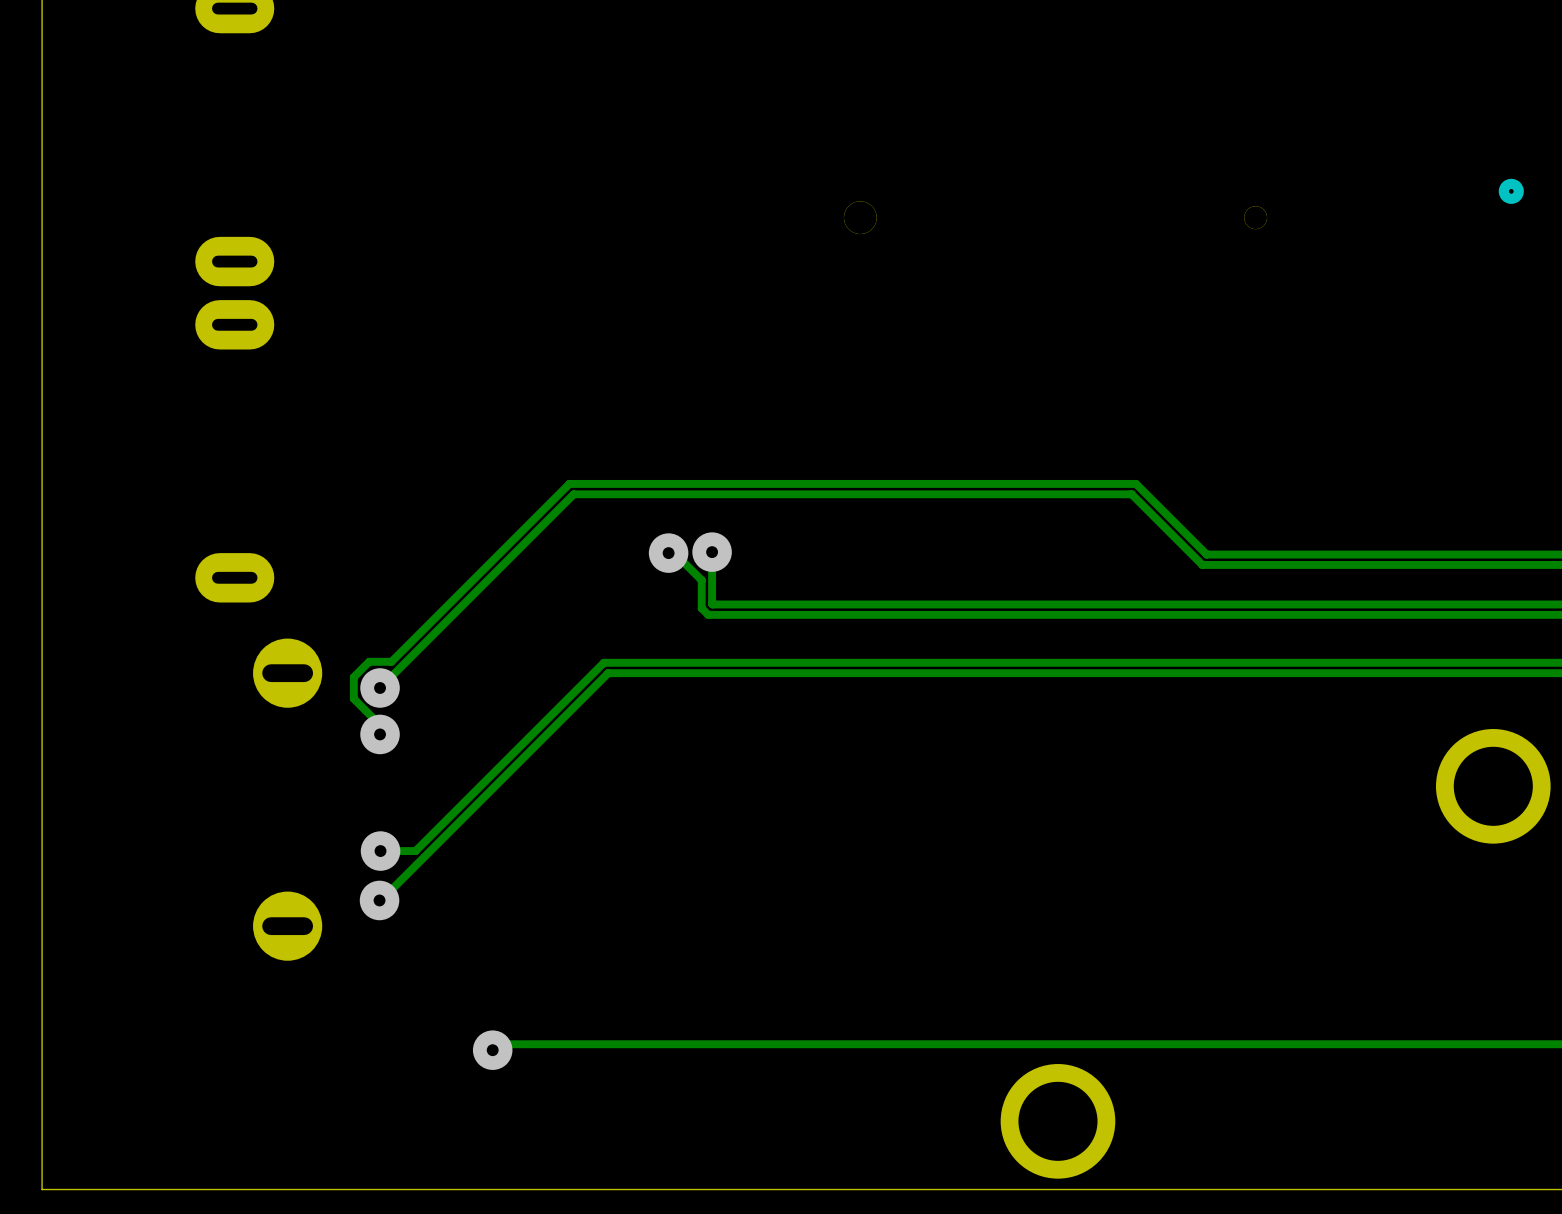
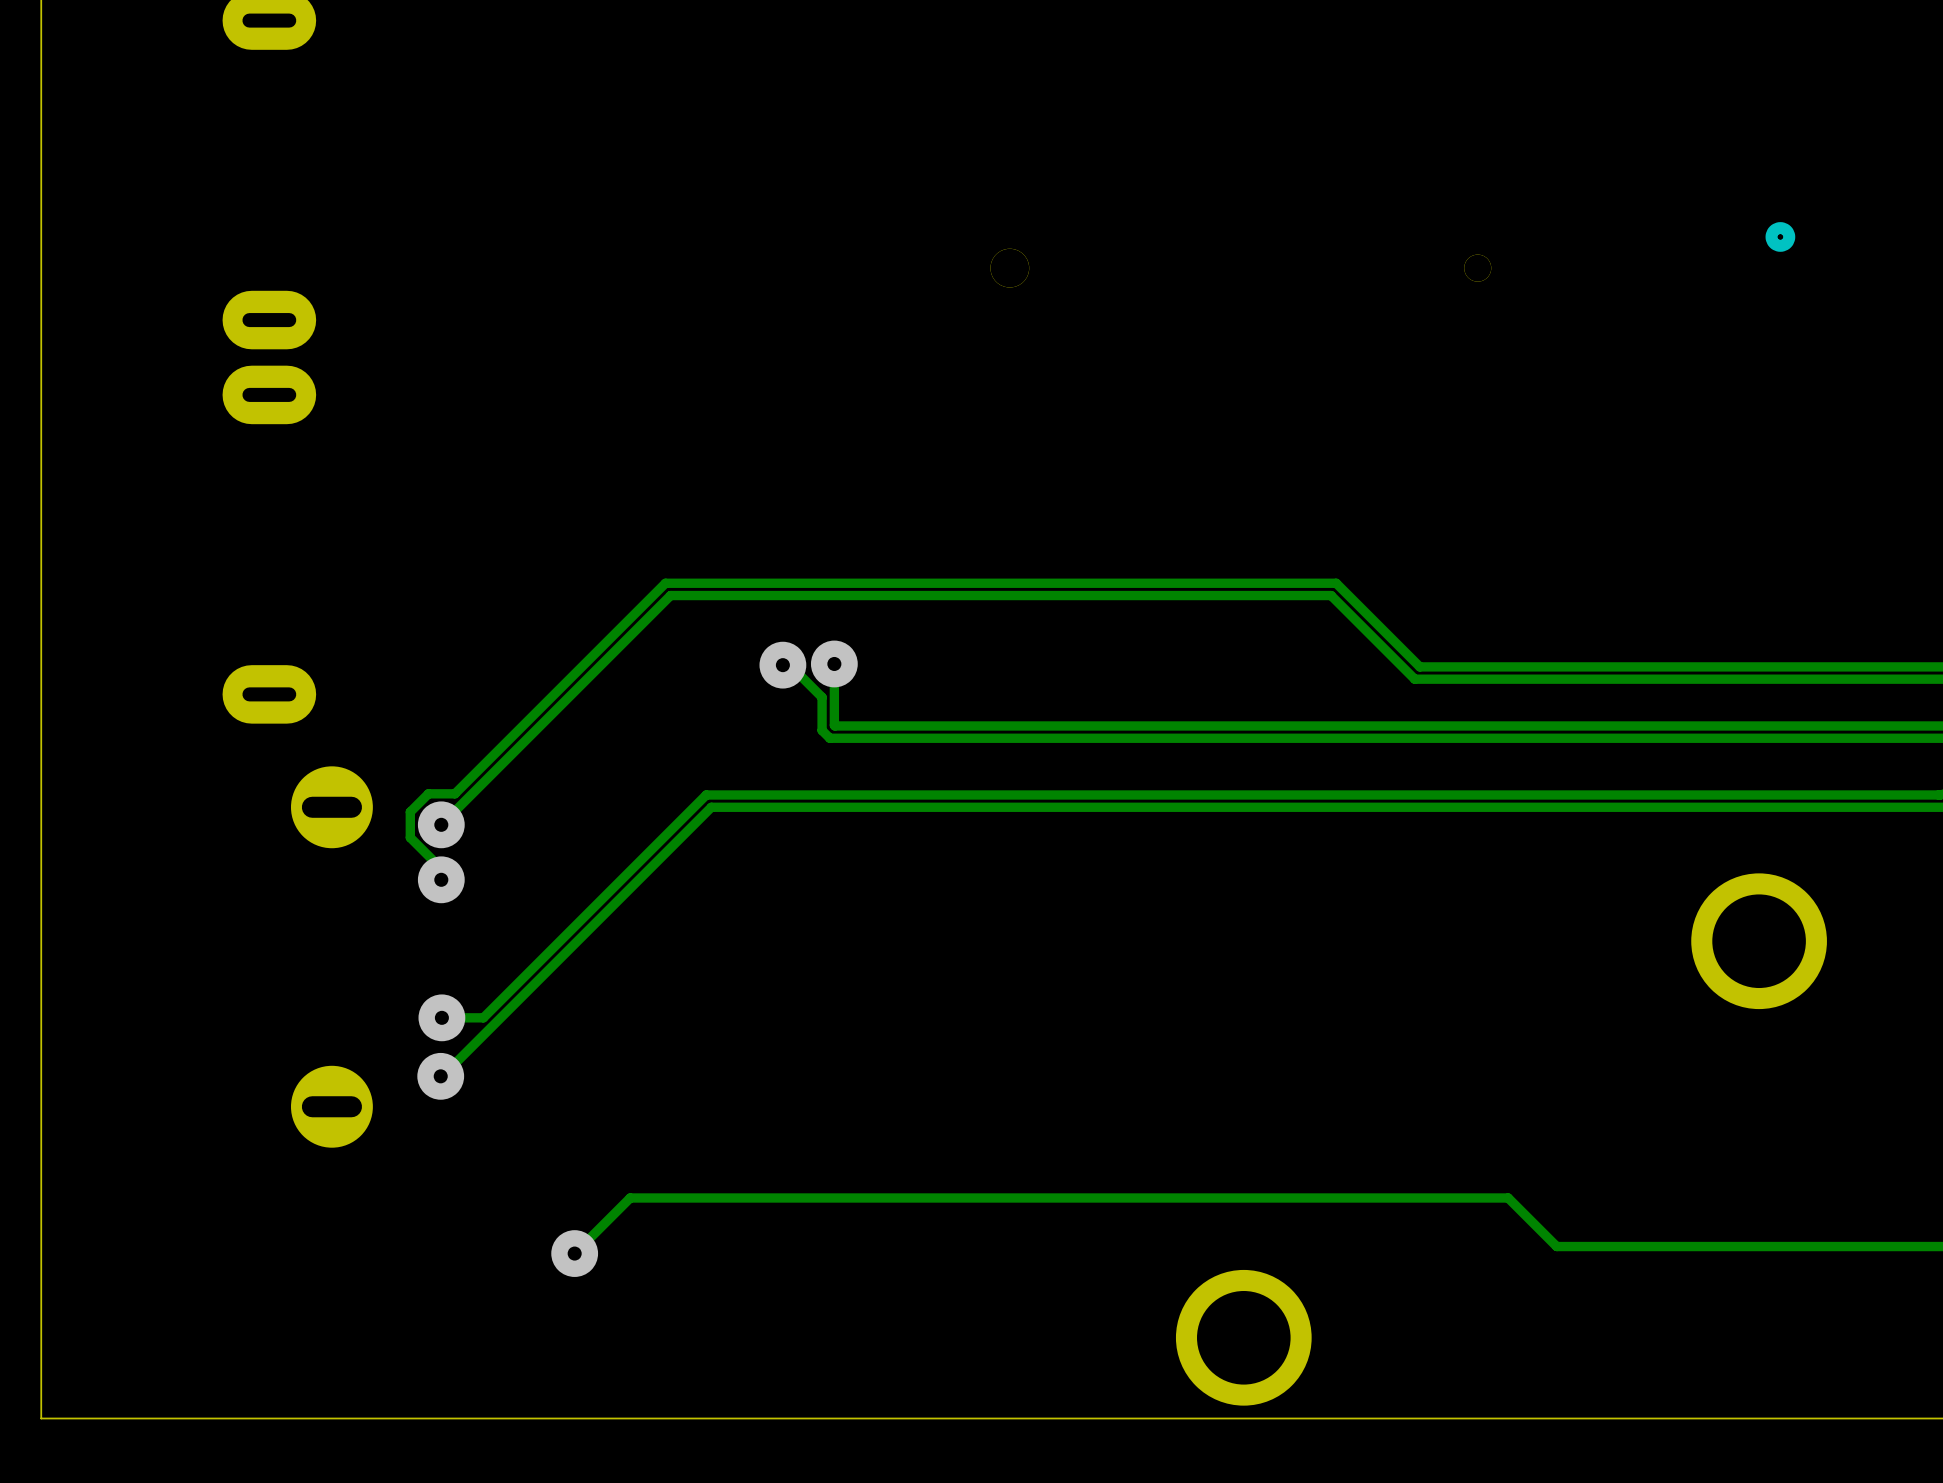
track: (1322, 1044) (498, 1044) -> (1556, 1246) (1508, 1197) (630, 1197) (581, 1246)

